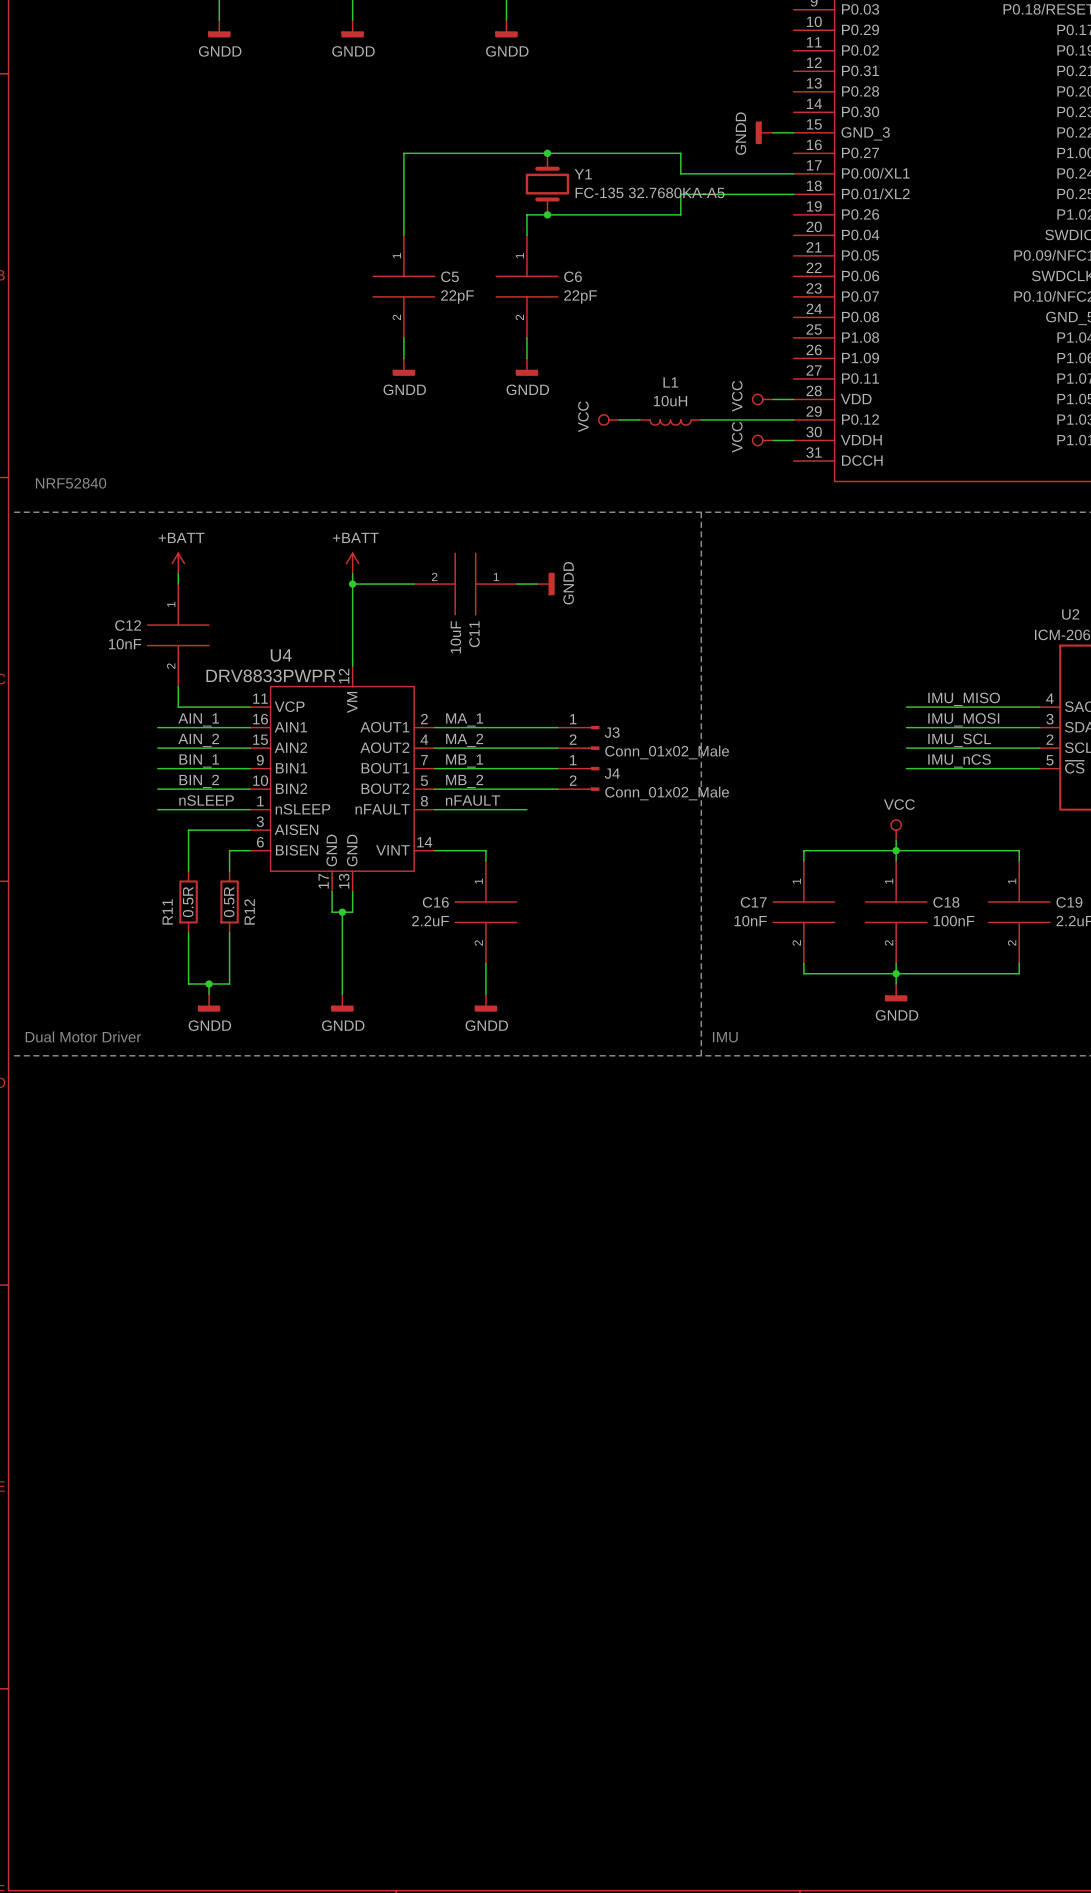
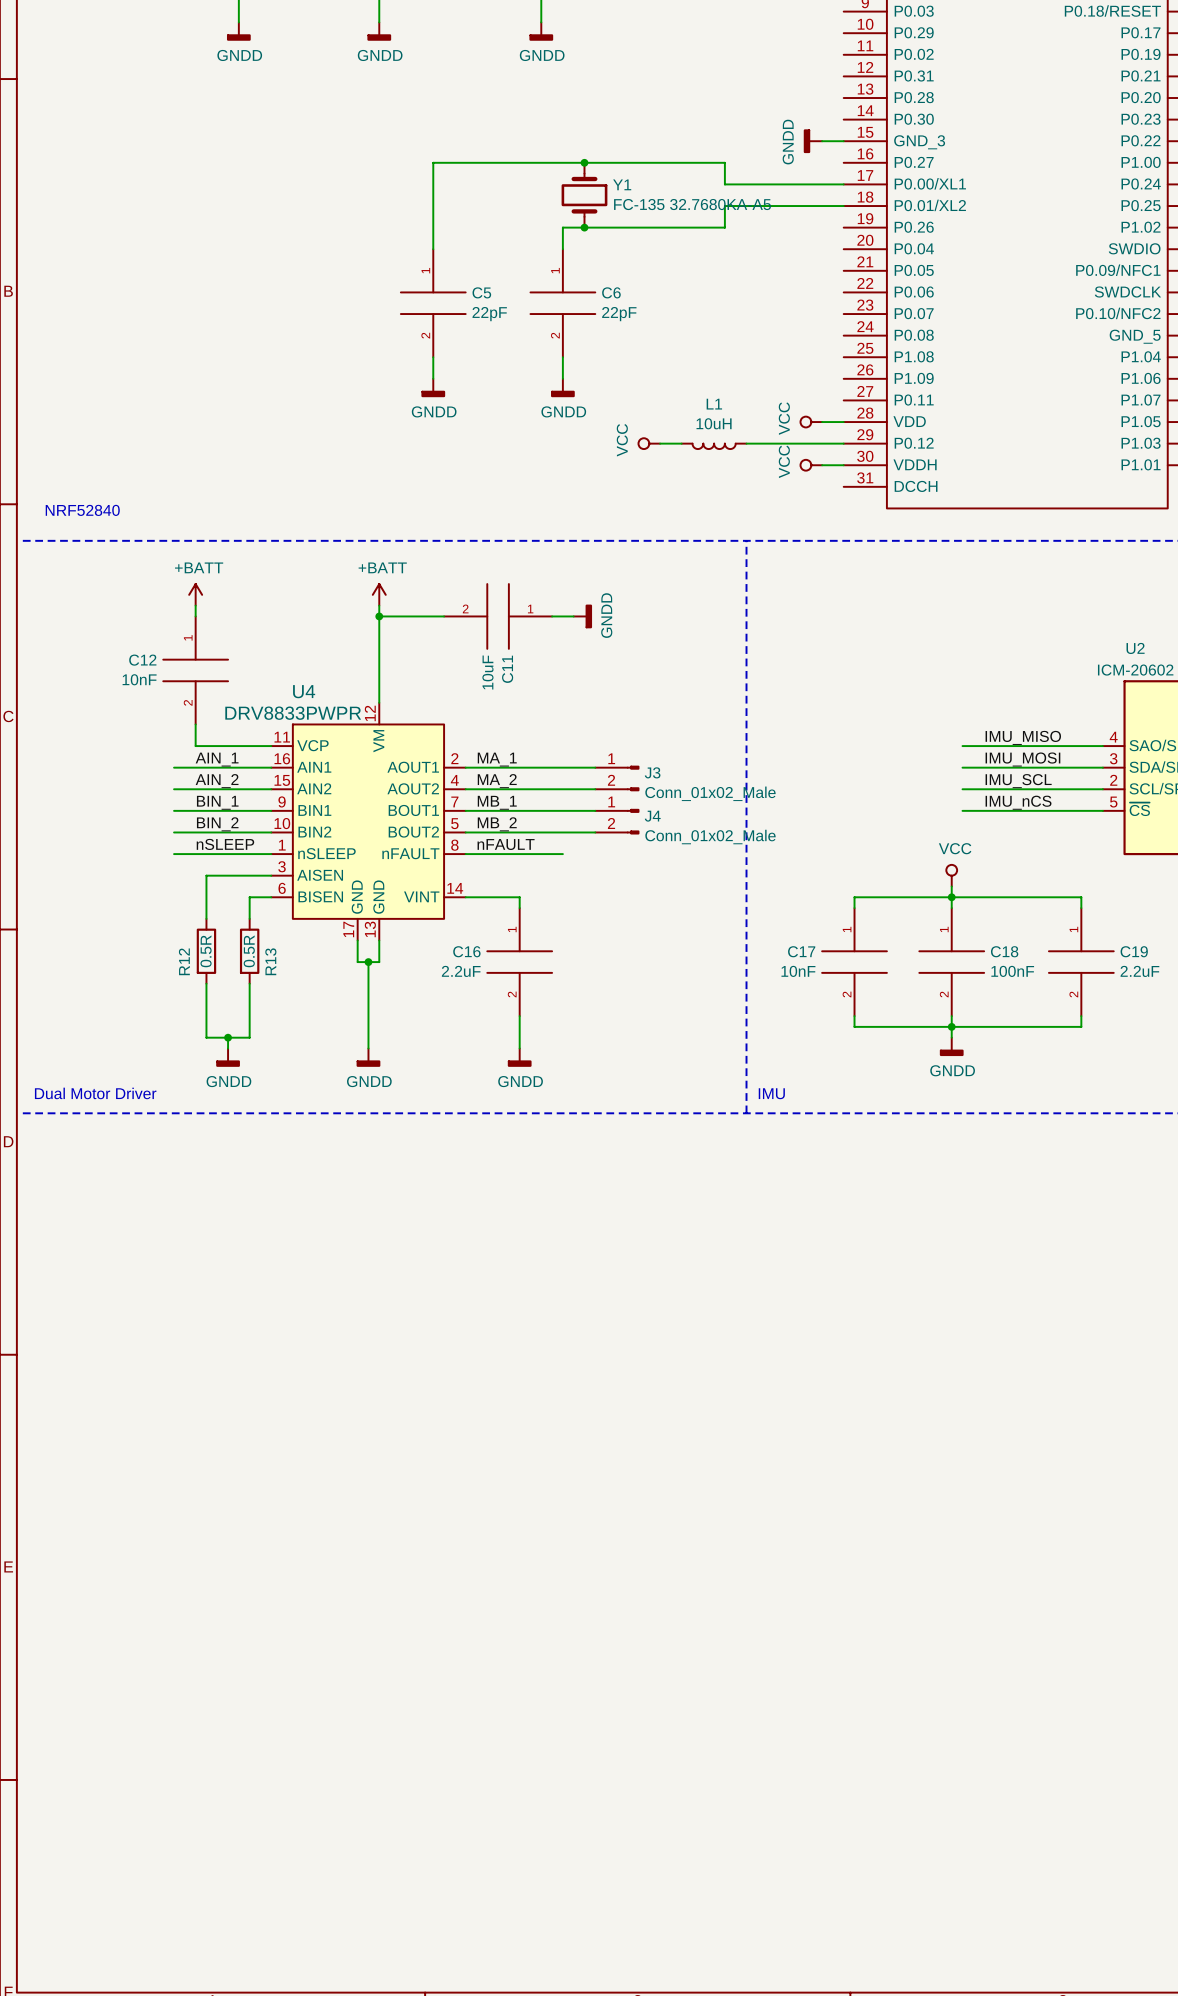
R11 name: R11 (167, 911) -> R12 (184, 961)
R12 name: R12 (249, 911) -> R13 (270, 961)

